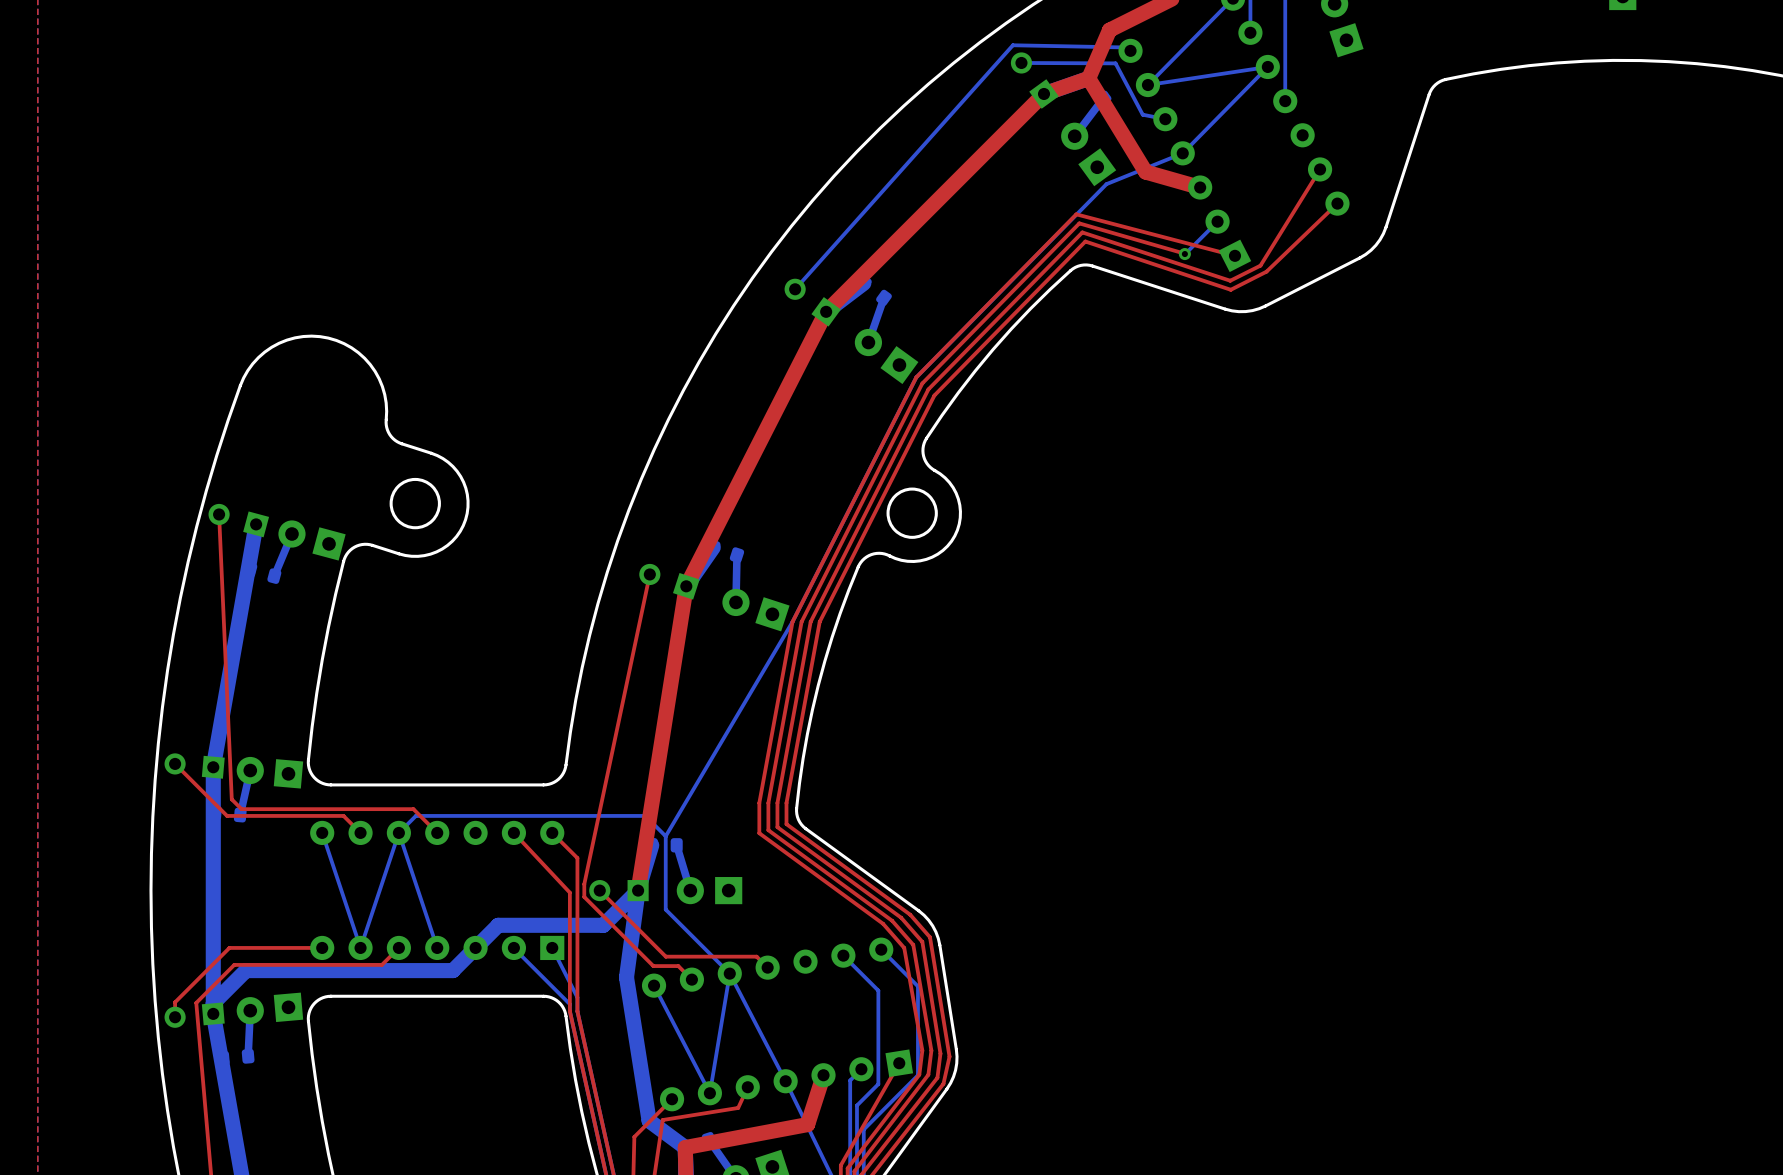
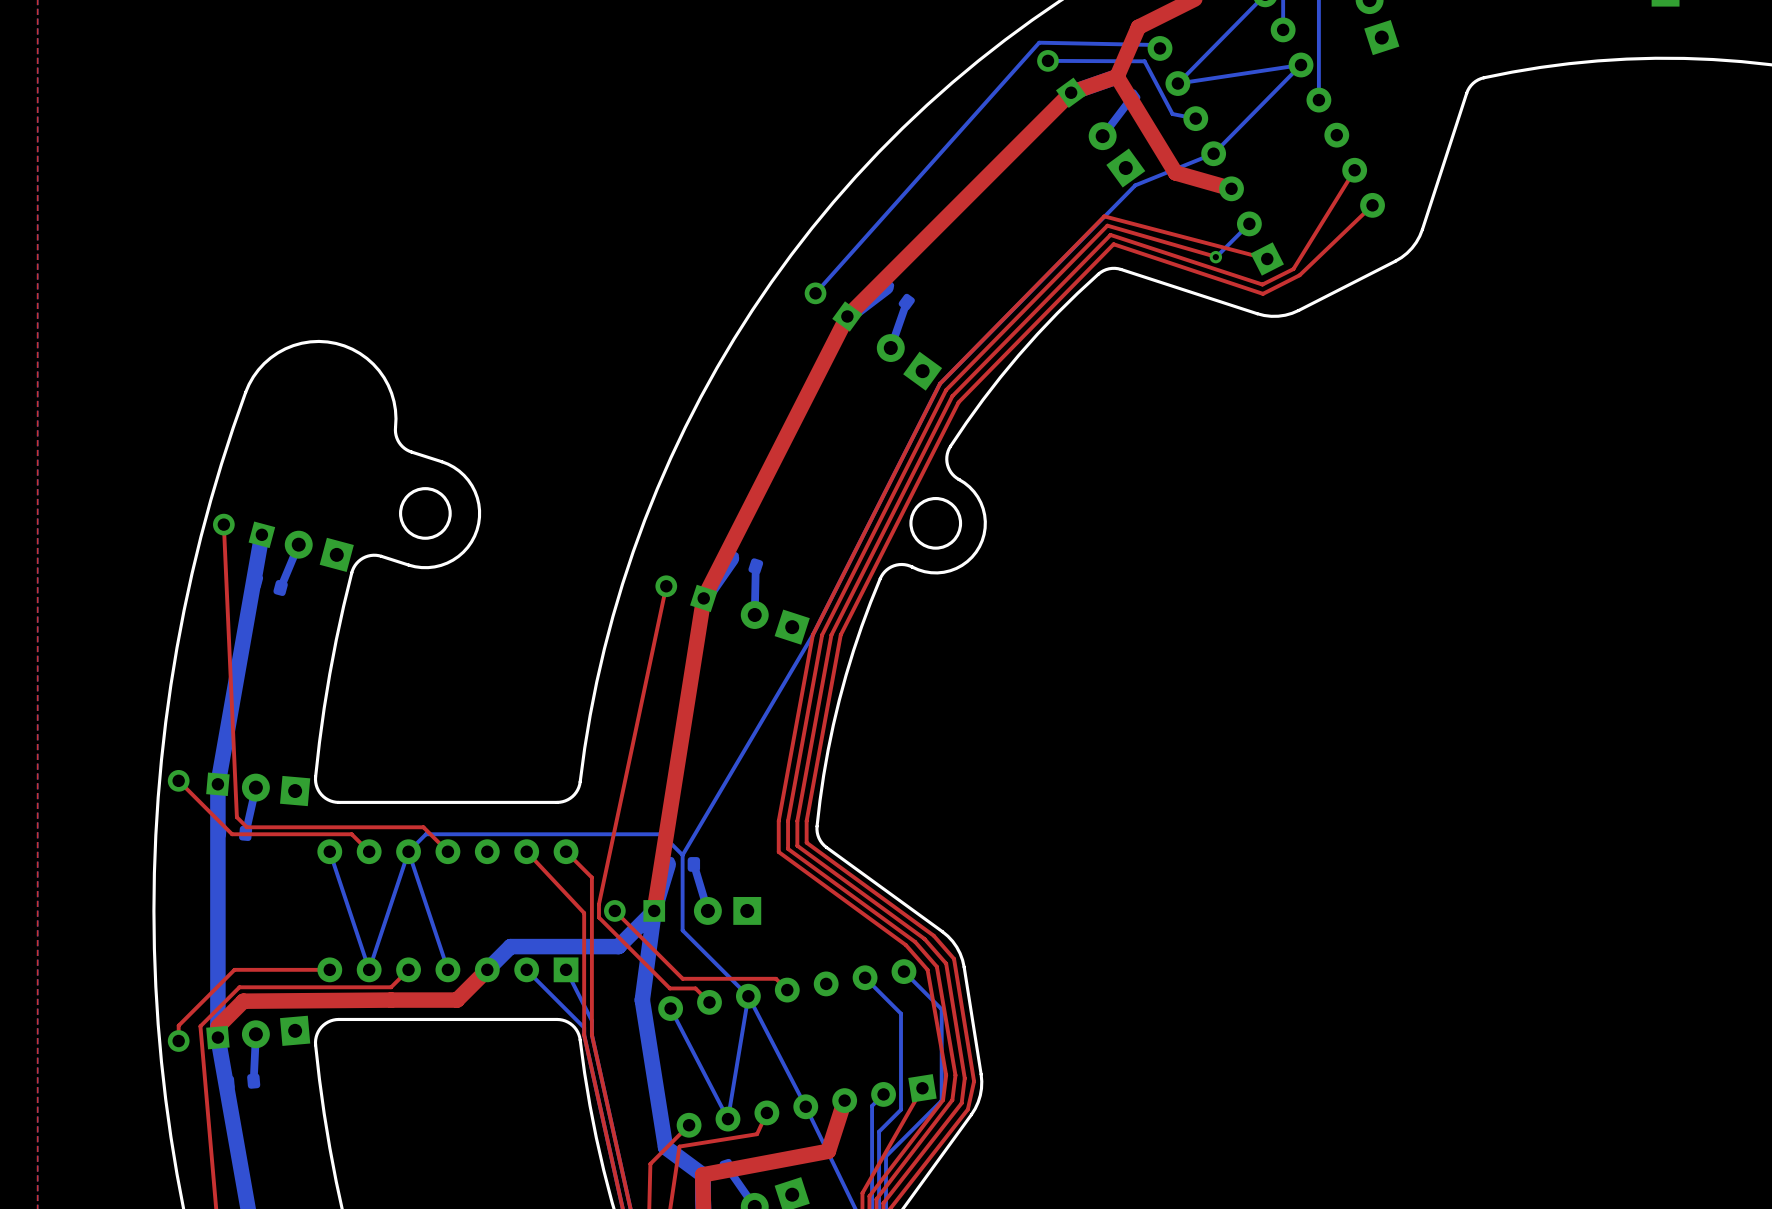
top track: none -> (487, 969) (457, 1000) (243, 1001) (217, 1026)
bottom track: (475, 947) (452, 970) (245, 970) (213, 1003) -> none

